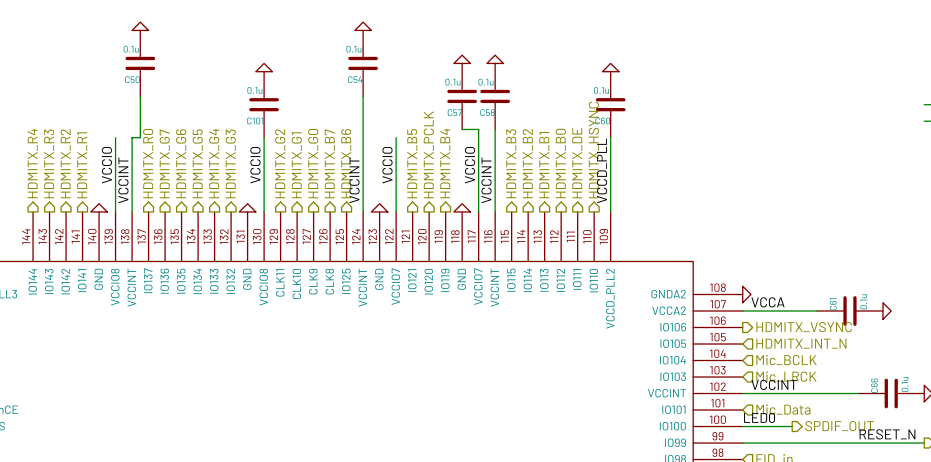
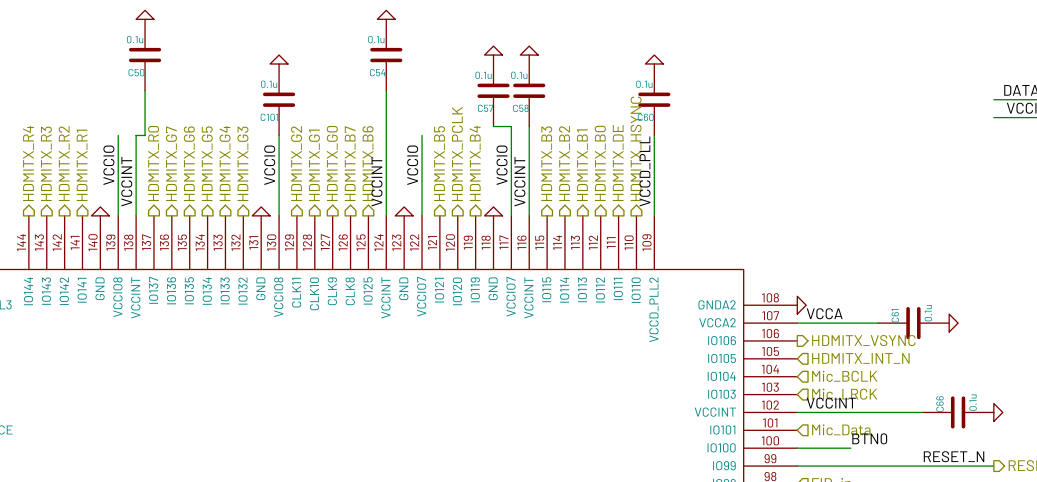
label: LED0 (759, 417) -> none
label: none -> BTN0 (869, 438)
hierarchical label: SPDIF_OUT (839, 426) -> none

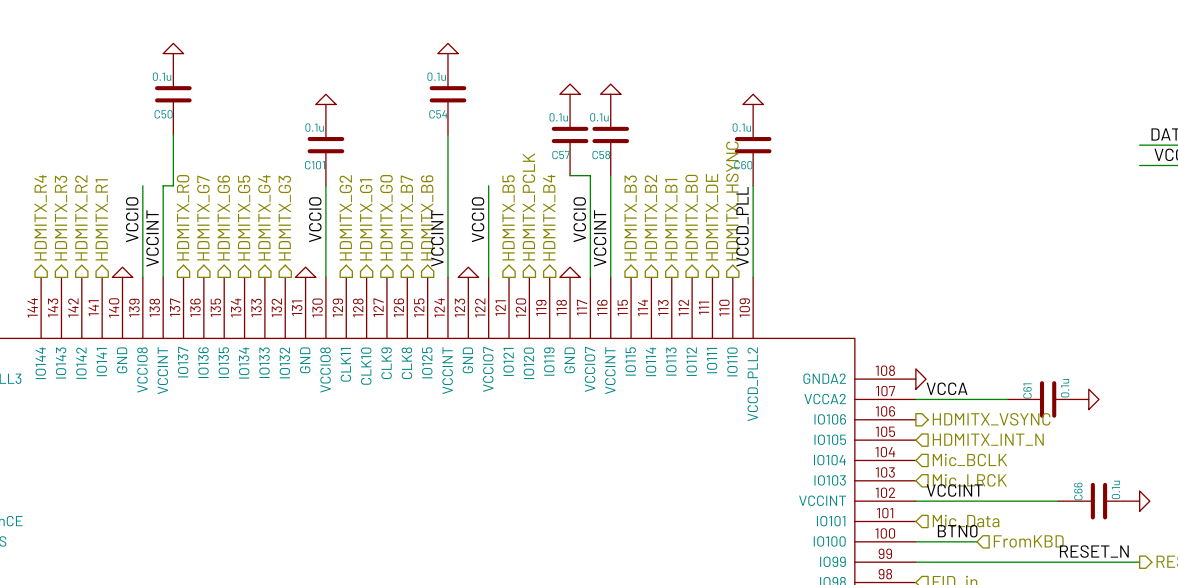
label position: BTN0 (869, 438) -> BTN0 (957, 531)
hierarchical label: none -> FromKBD (1028, 541)

